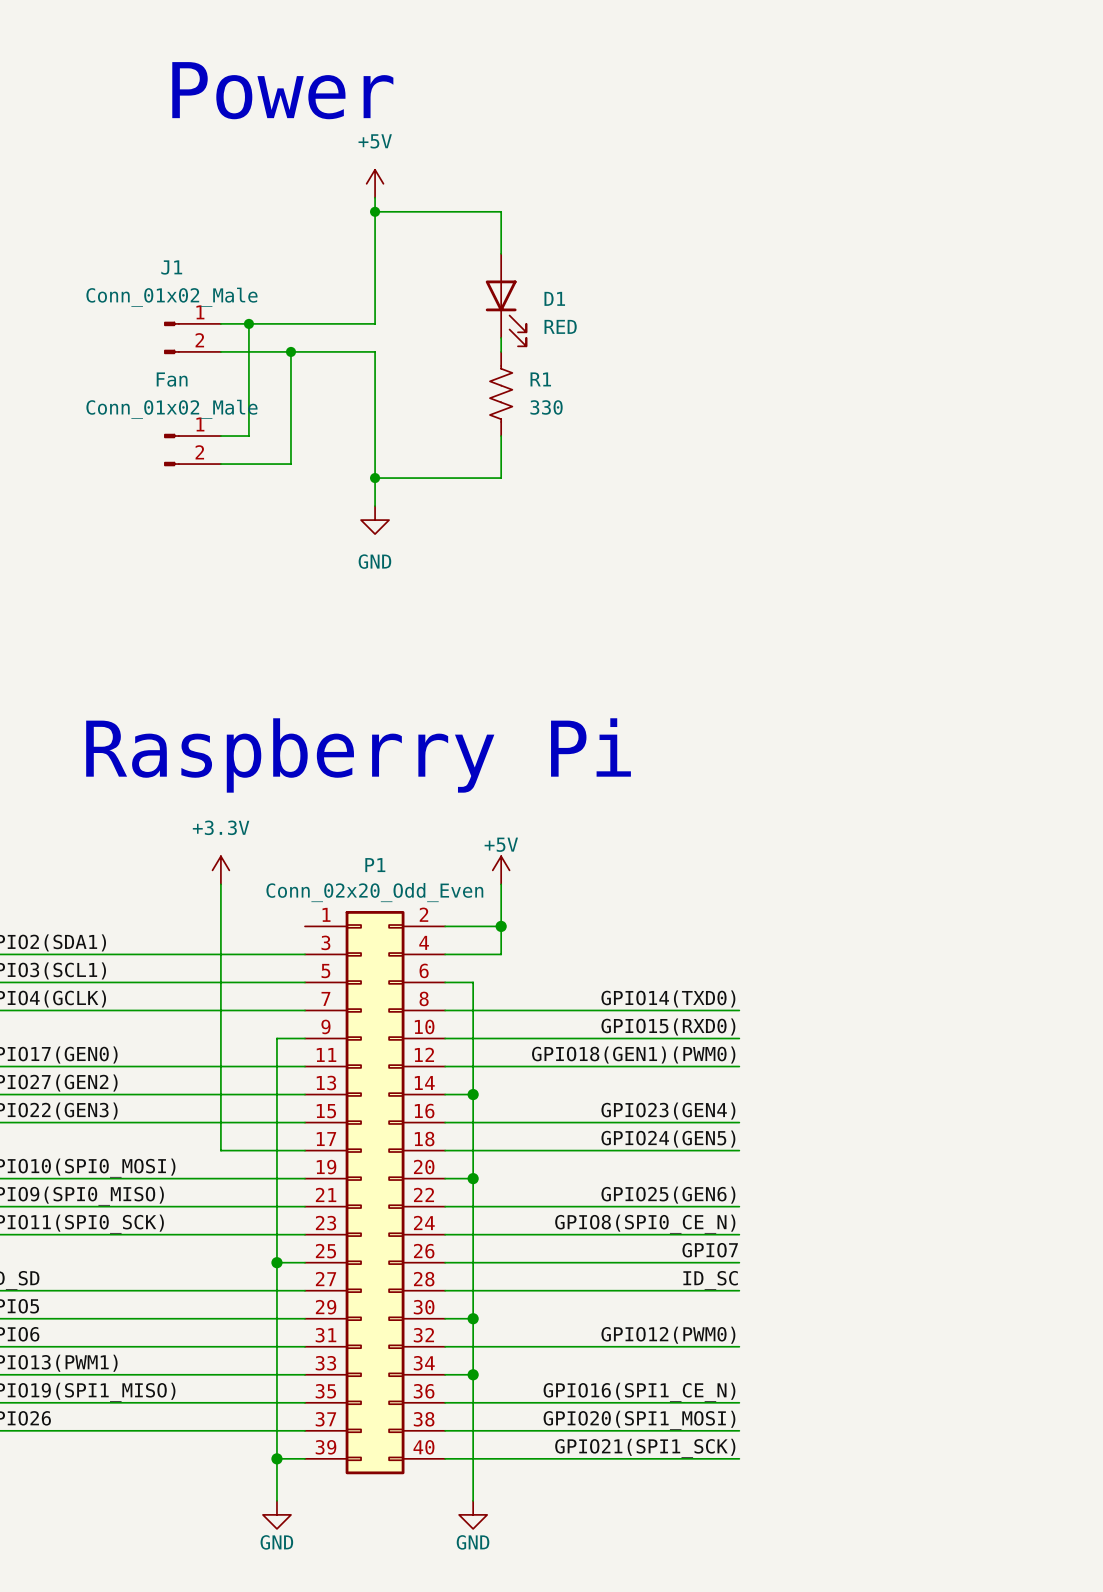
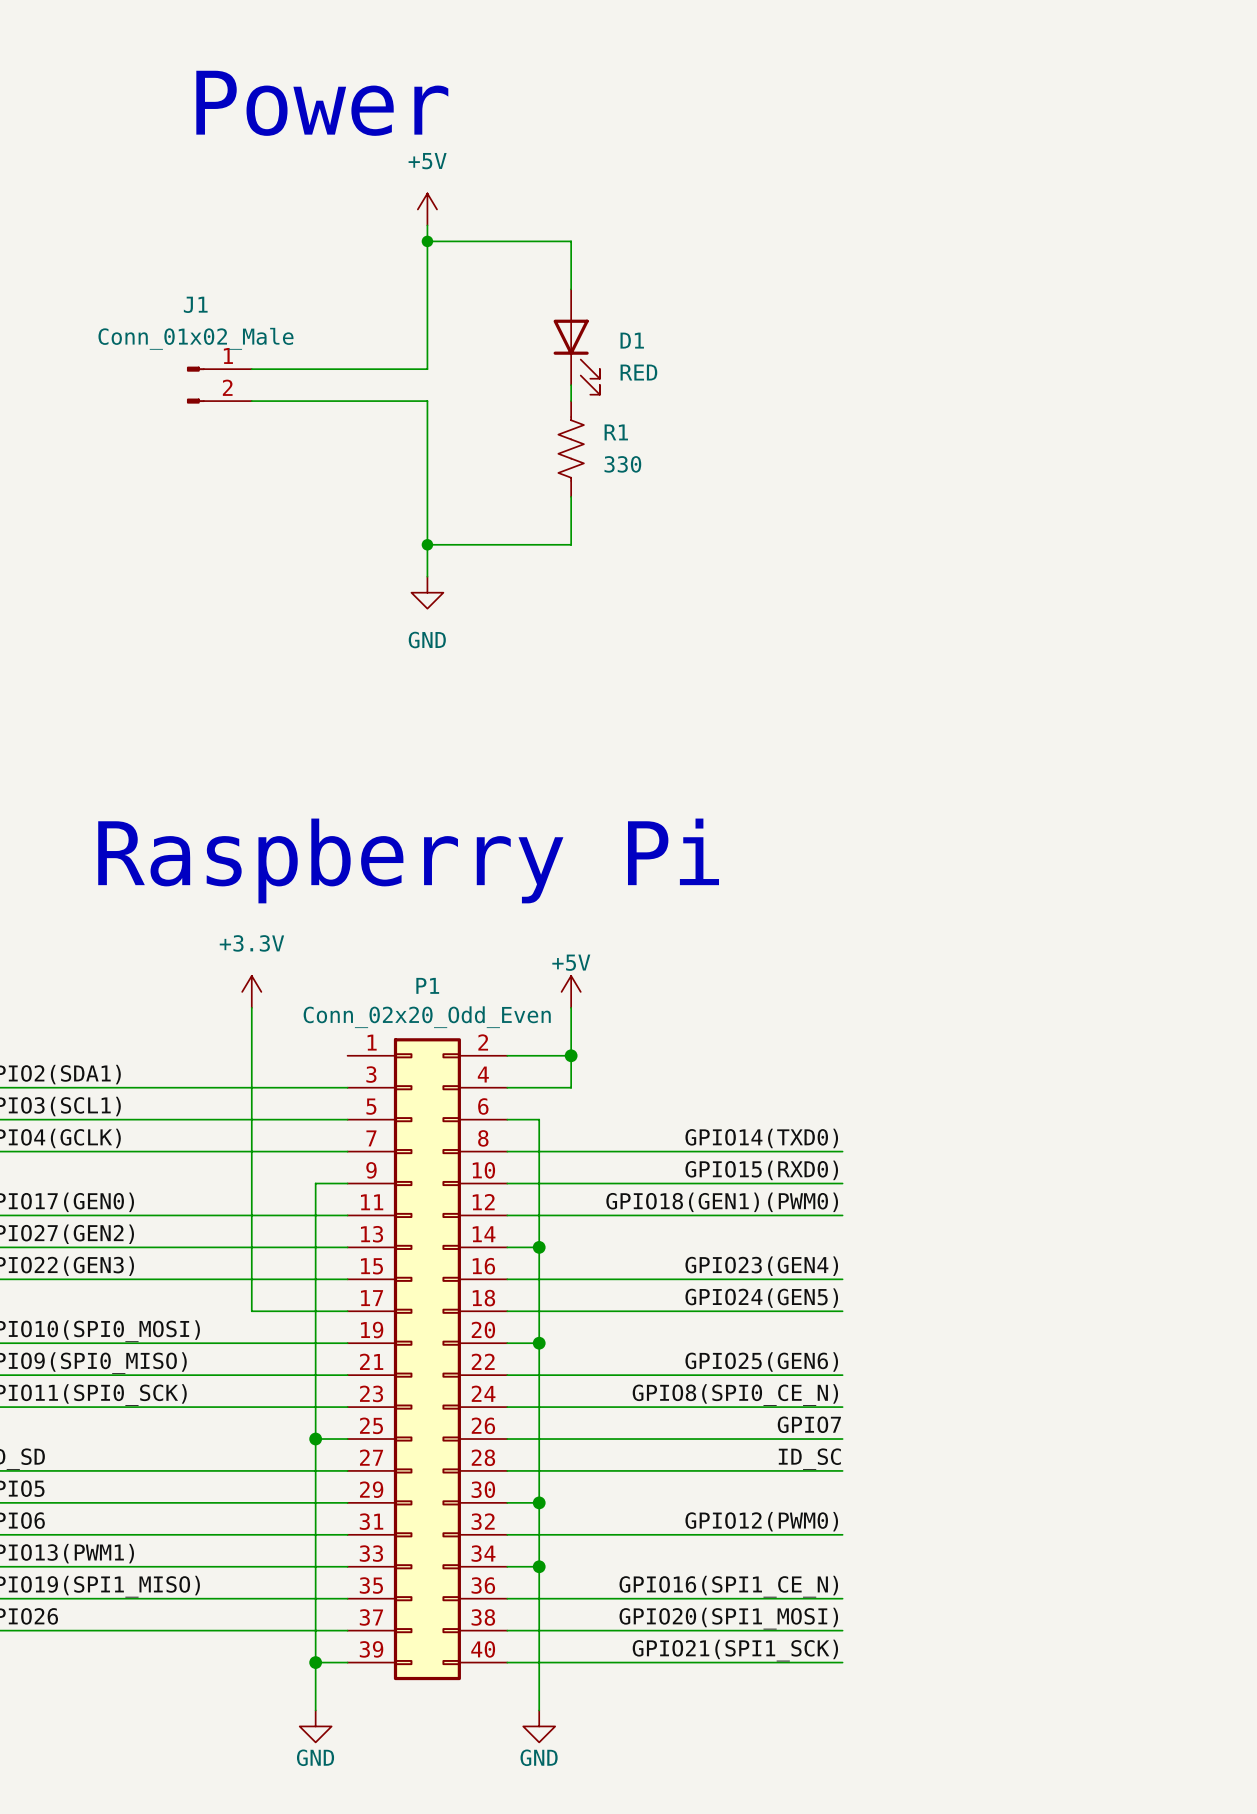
wire: (248, 323) (248, 436) (220, 436) -> none
junction: (248, 323) -> none
wire: (290, 351) (290, 464) (220, 464) -> none
junction: (290, 351) -> none
Fan: Conn_01x02_Male (192, 450) -> none

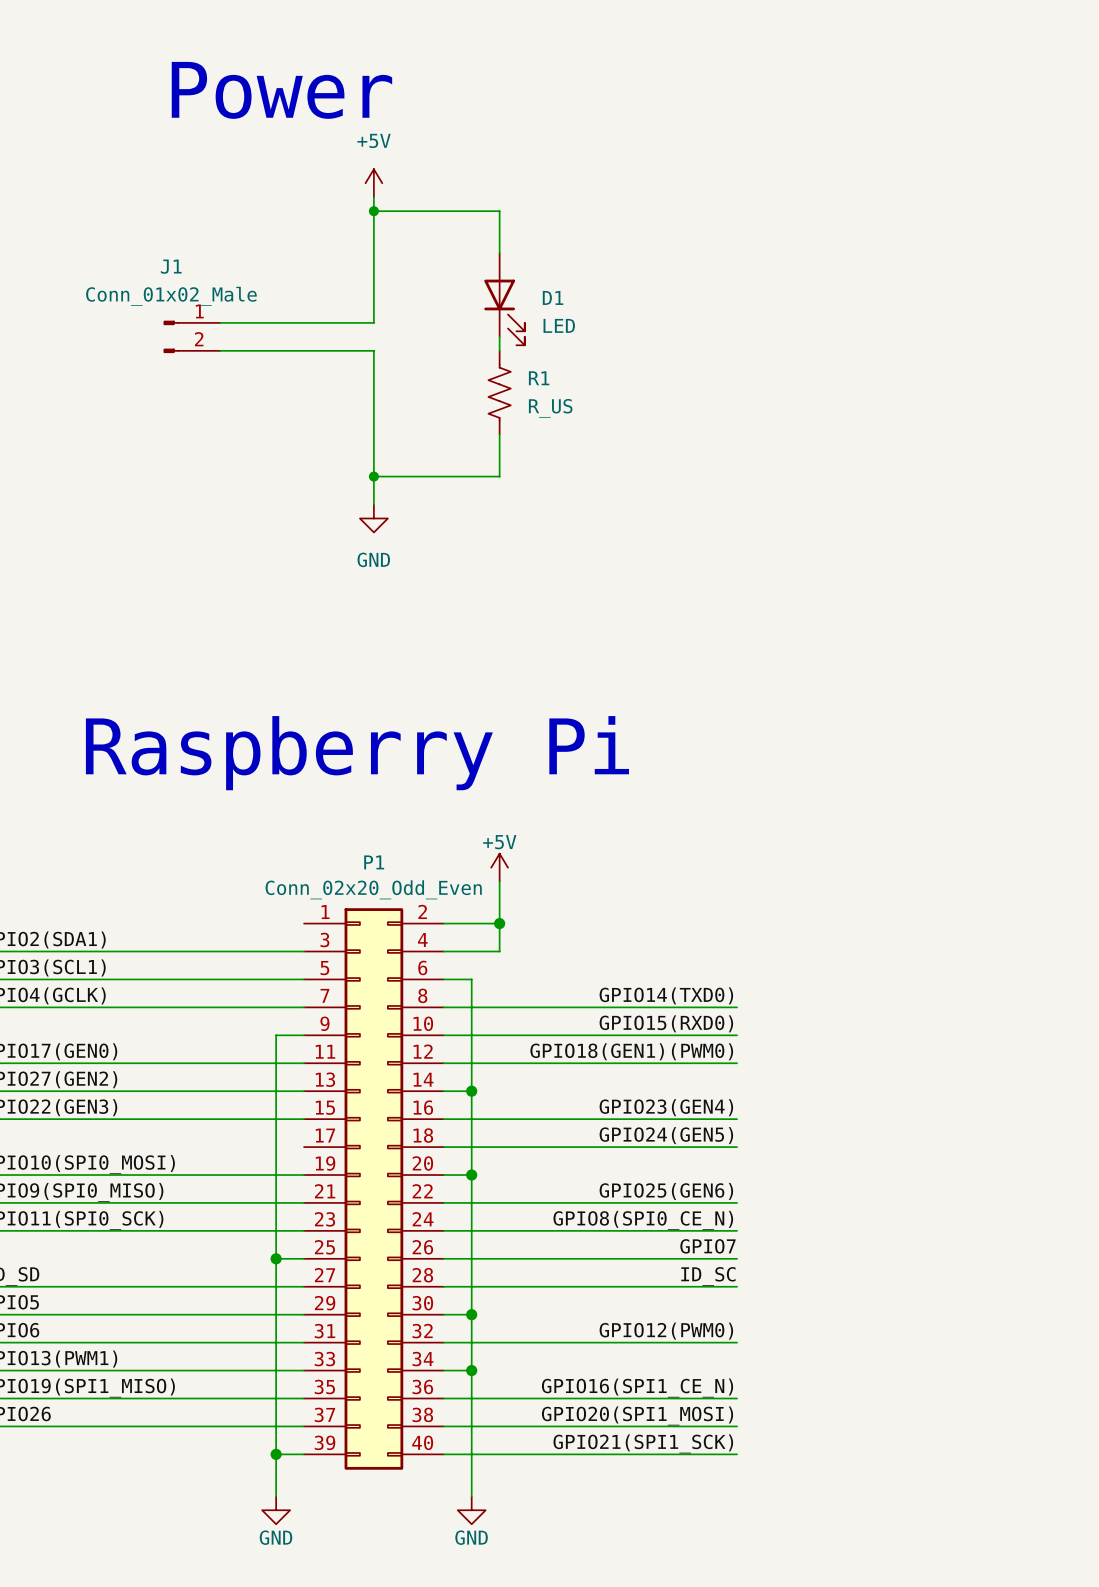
D1 value: RED (638, 372) -> LED (559, 325)
R1 value: 330 (622, 464) -> R_US (550, 408)
power symbol: +3.3V (251, 991) -> none
wire: (251, 1007) (251, 1311) (347, 1311) -> none

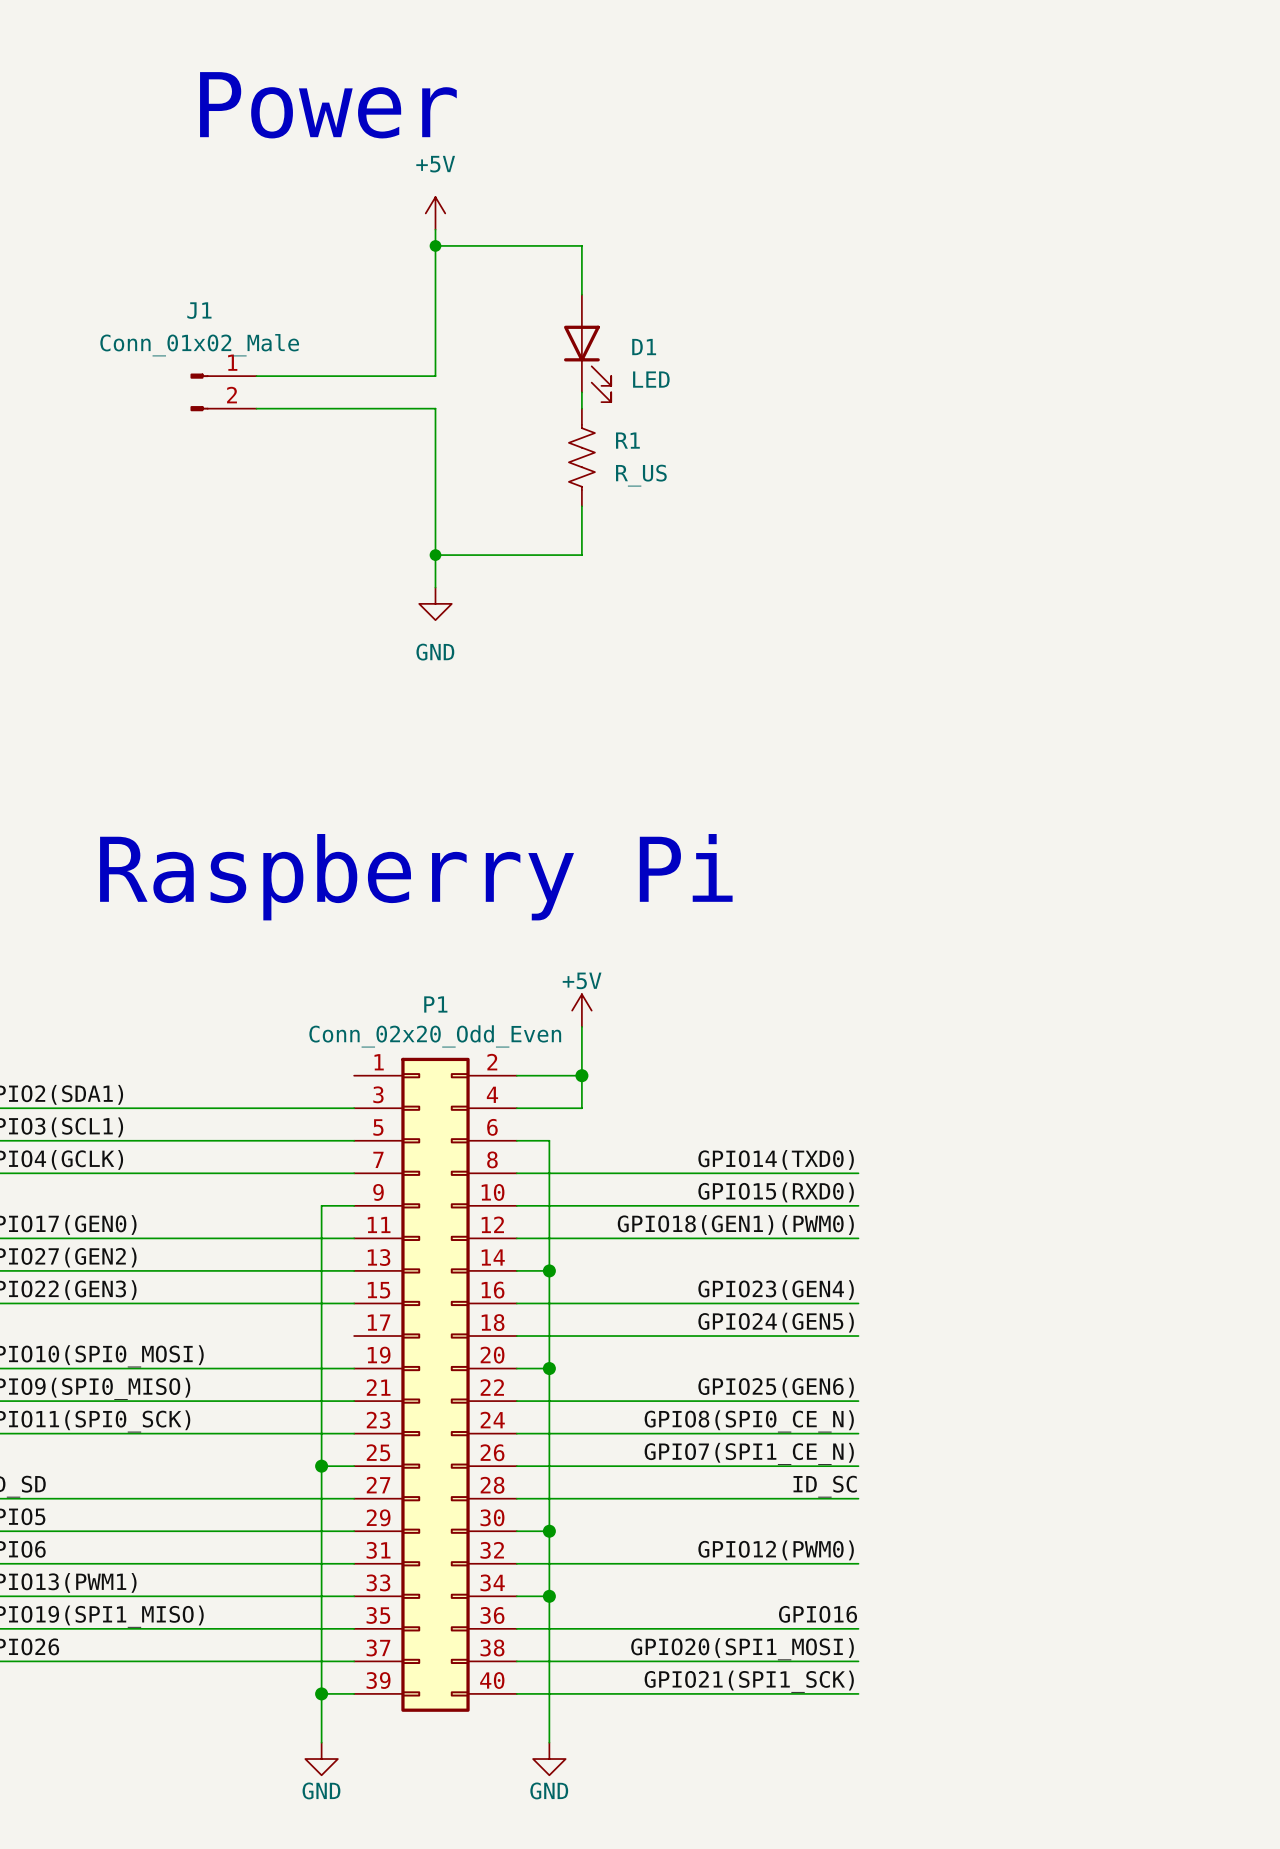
label: GPIO7 (708, 1246) -> GPIO7(SPI1_CE_N) (749, 1453)
label: GPIO16(SPI1_CE_N) (637, 1388) -> GPIO16 (818, 1614)

